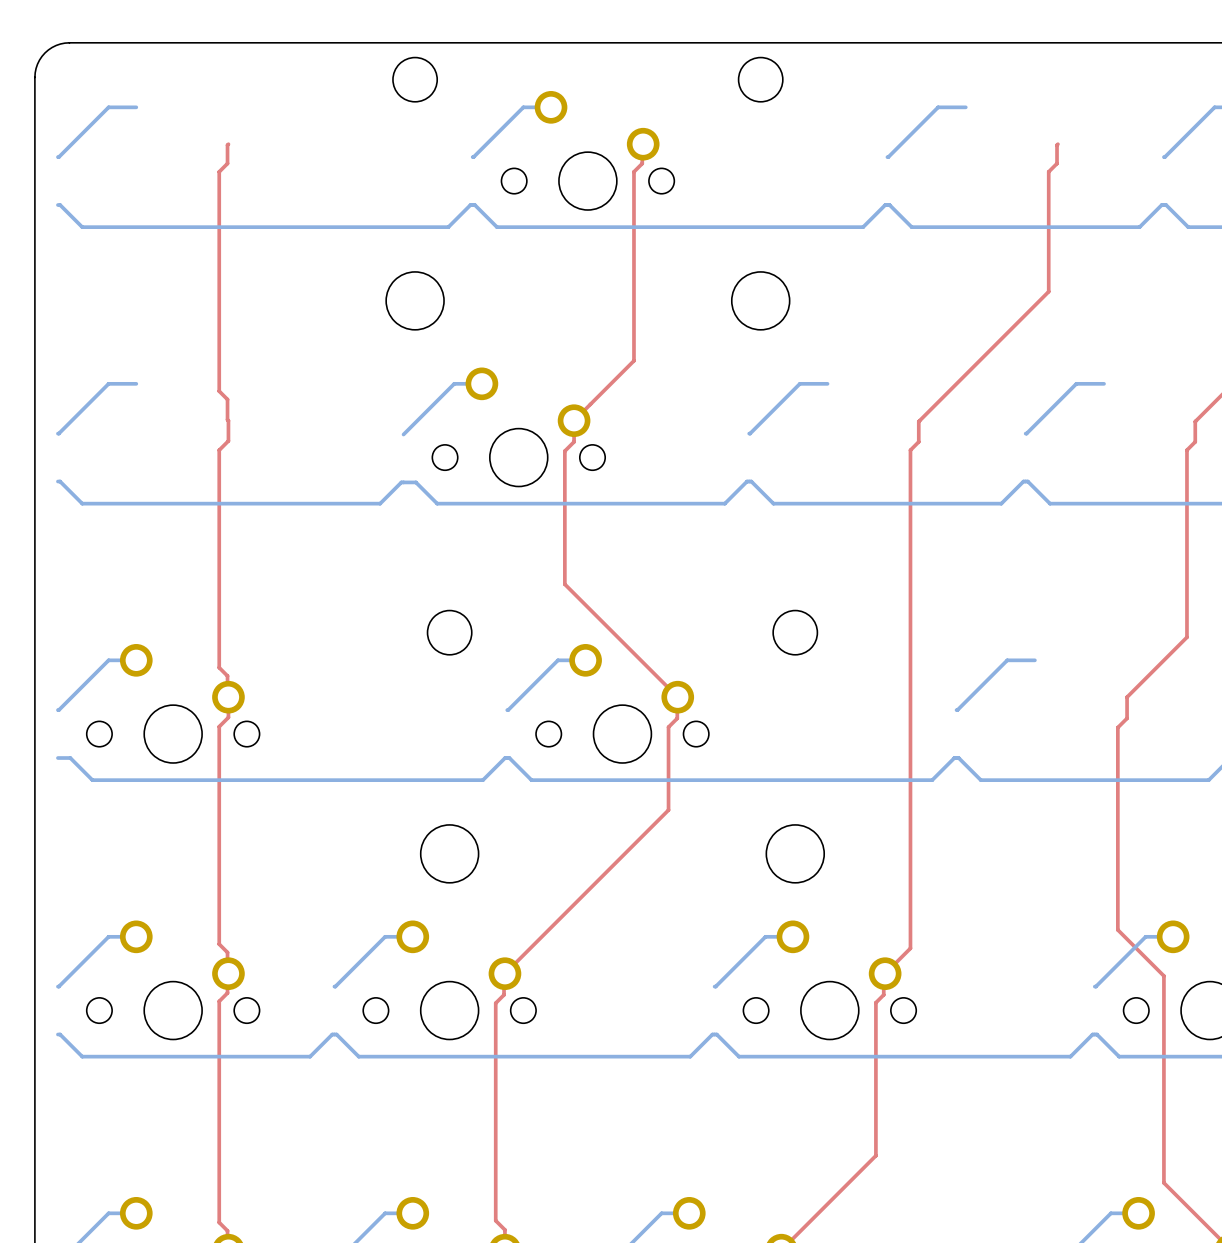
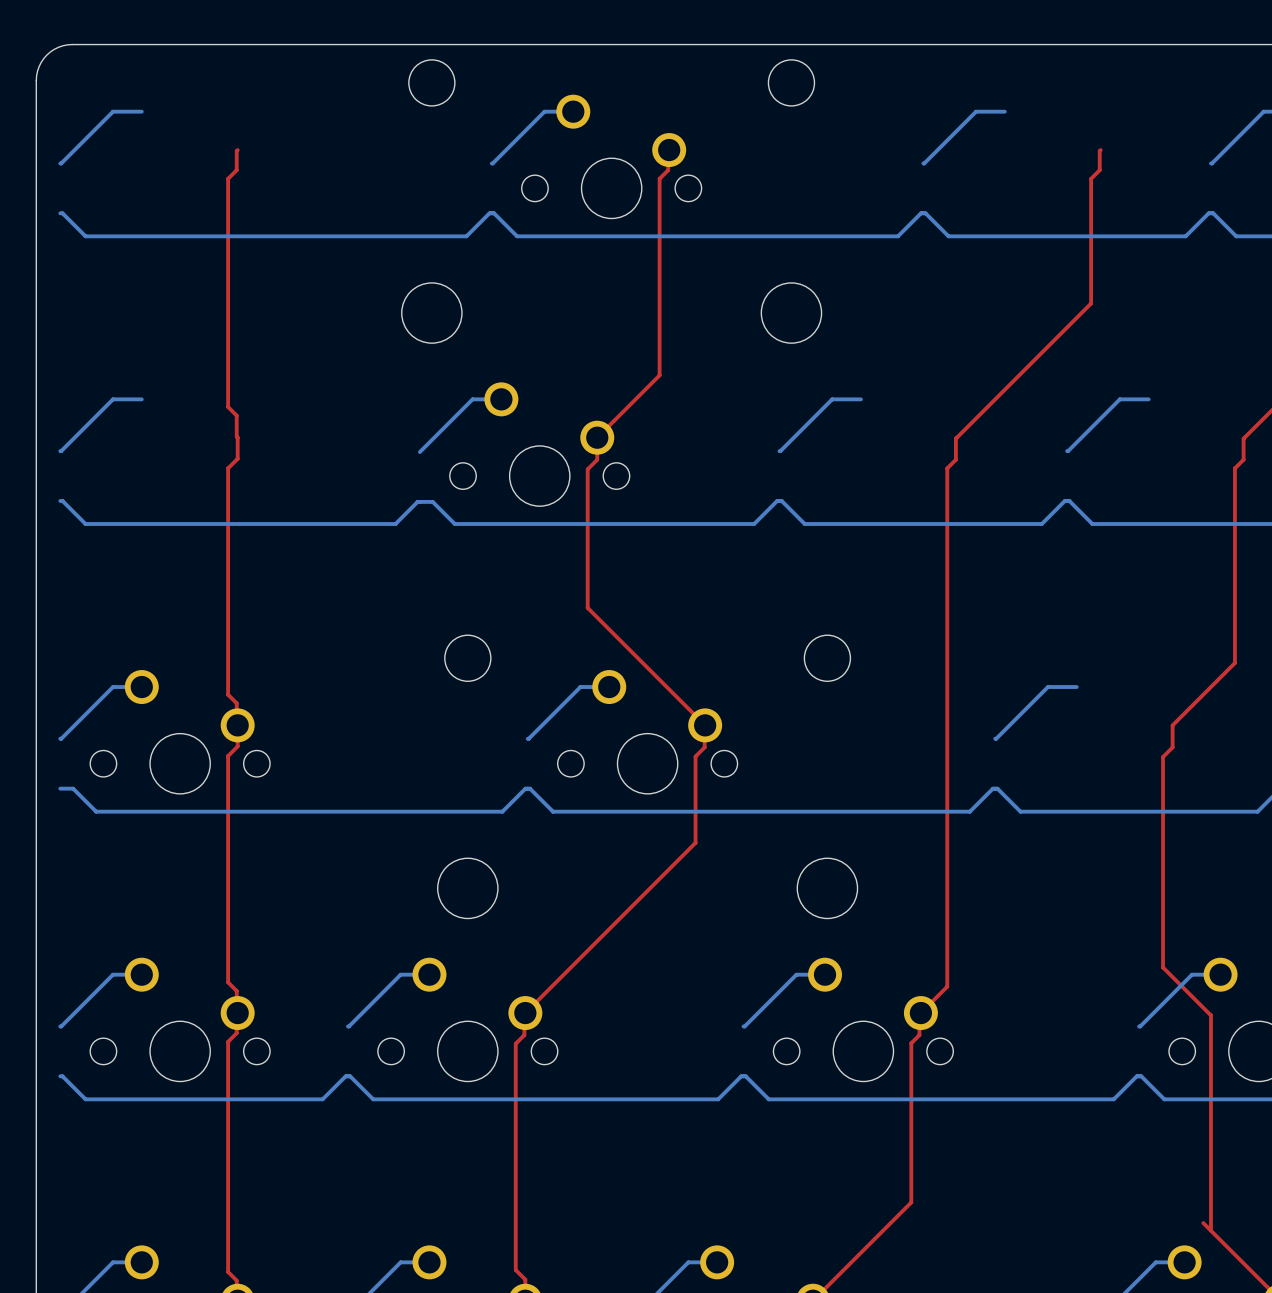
top track: none -> (1203, 1223) (1210, 1230)

